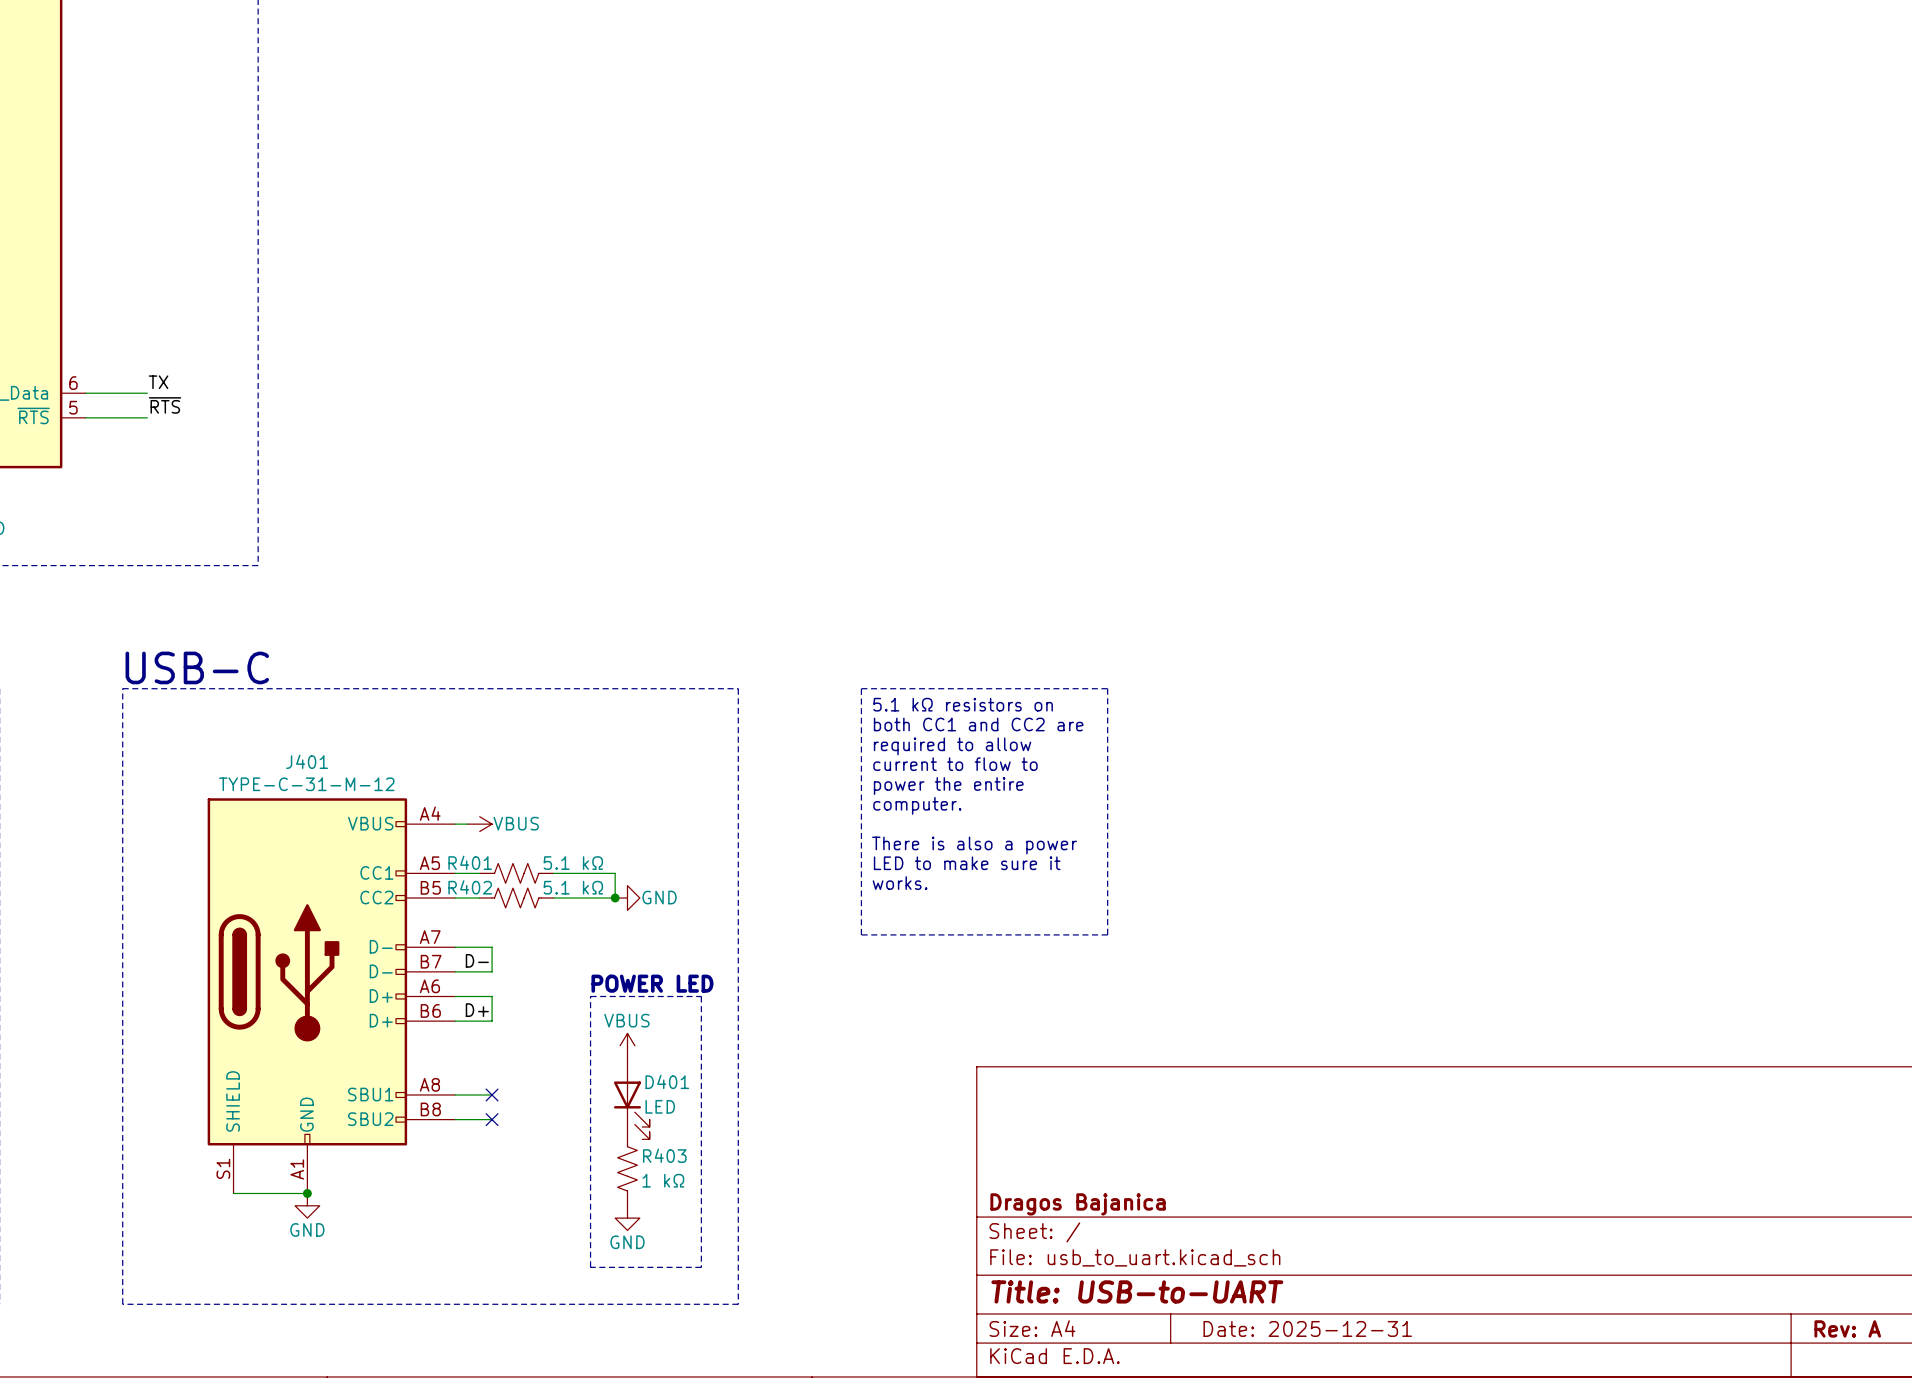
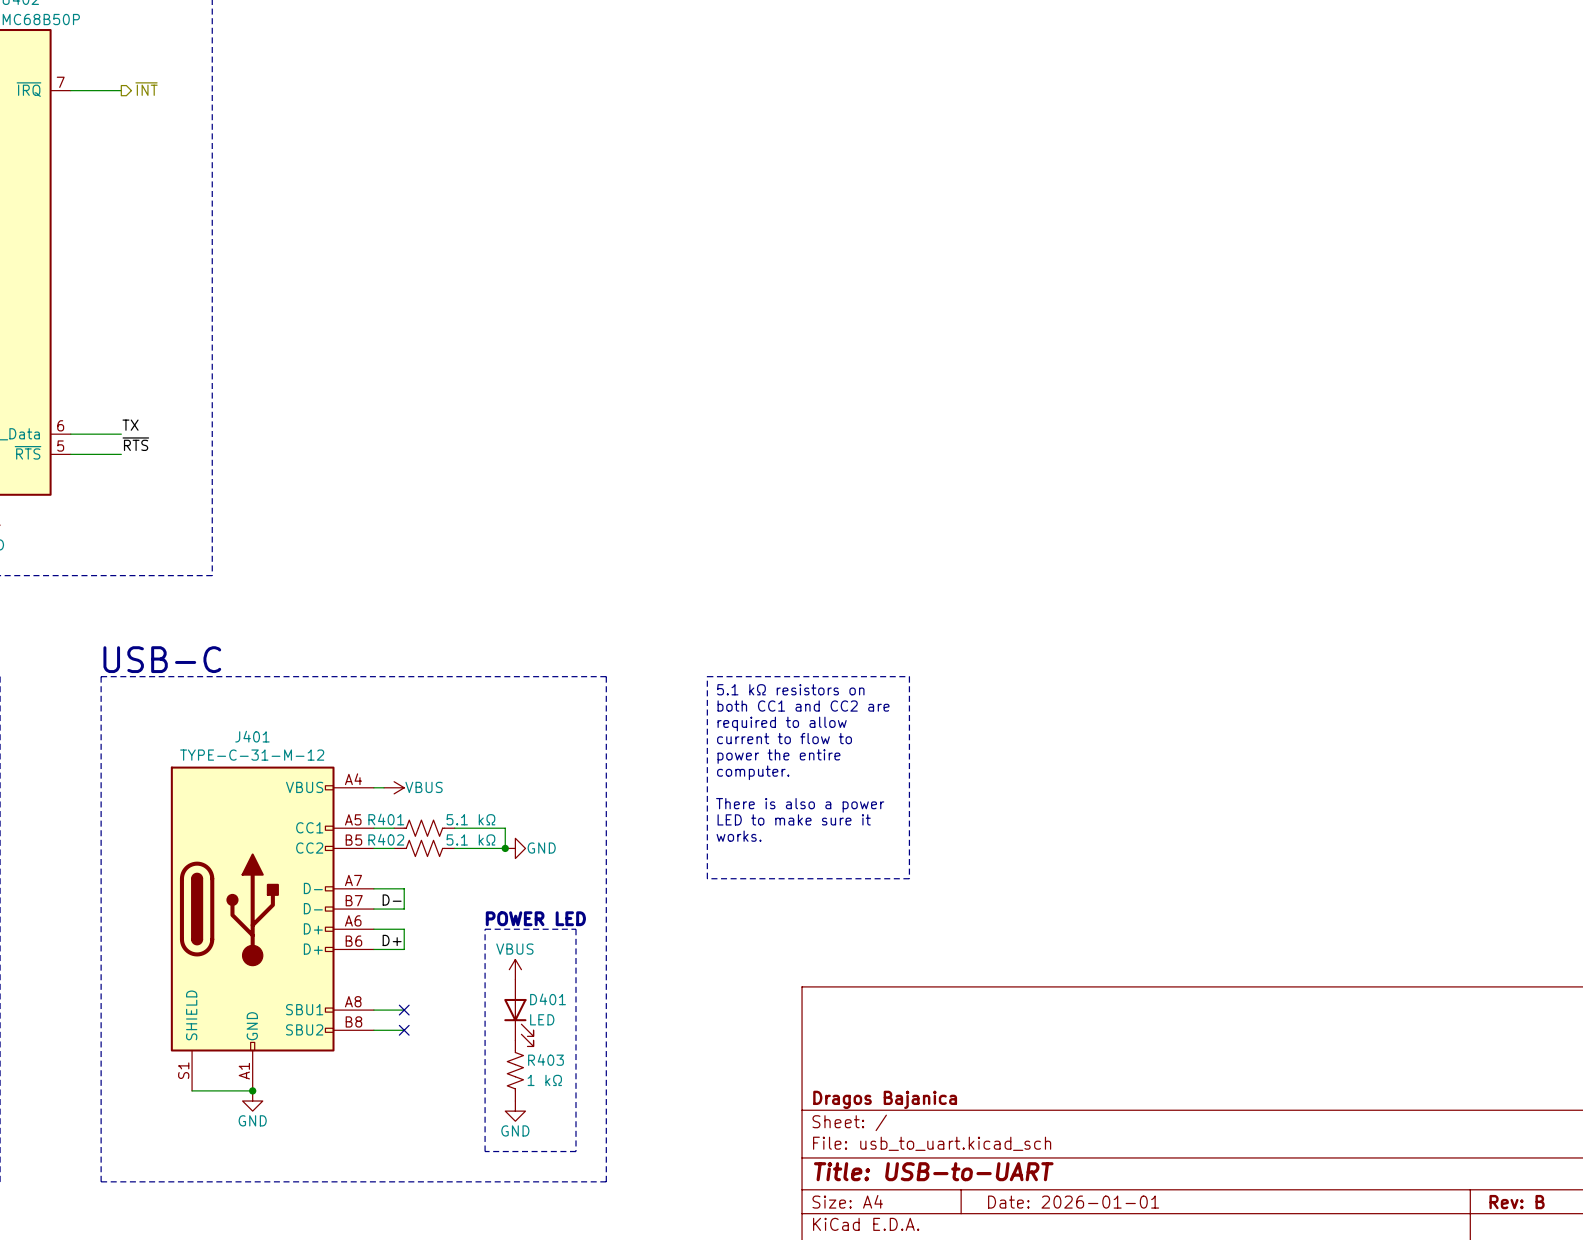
title block: Date: 2025-12-31 (1307, 1328) -> Date: 2026-01-01 (1073, 1202)
title block: Rev: A (1847, 1328) -> Rev: B (1517, 1202)

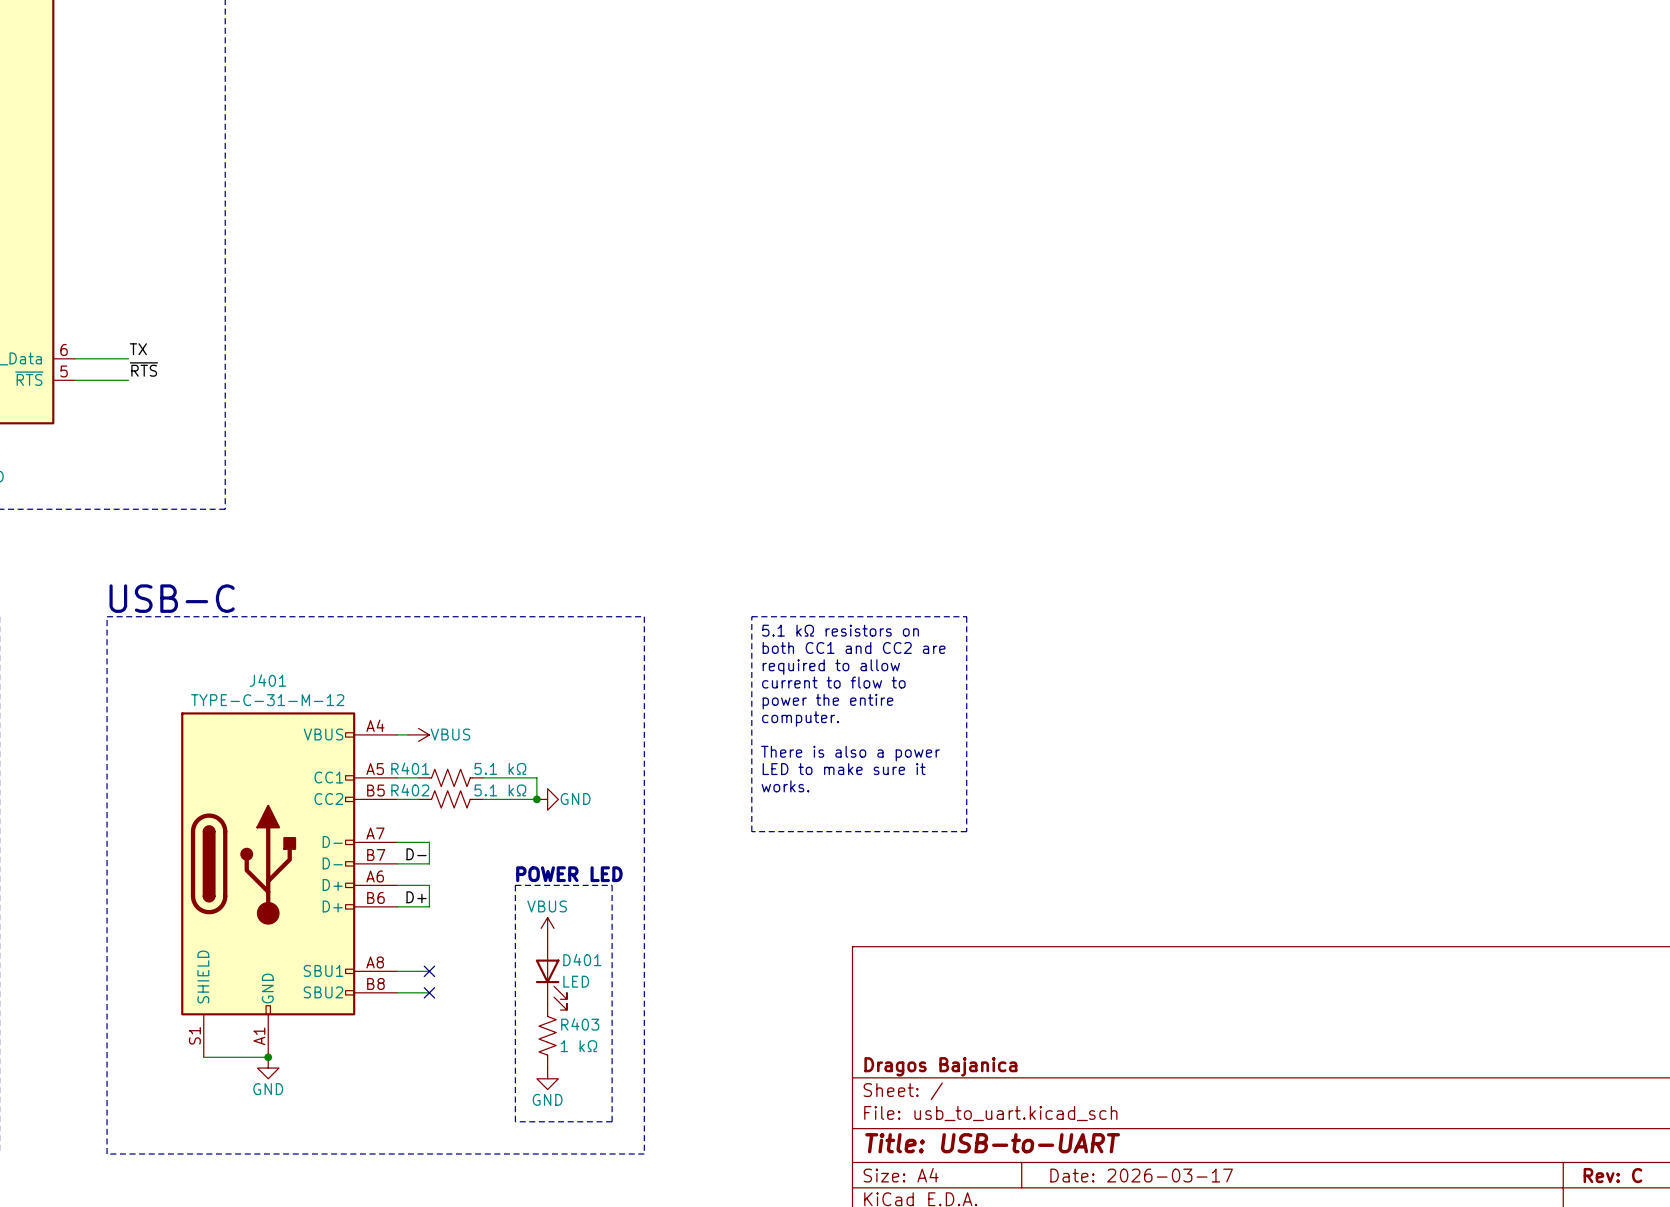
title block: Date: 2026-01-01 (1073, 1202) -> Date: 2026-03-17 (1141, 1175)
title block: Rev: B (1517, 1202) -> Rev: C (1612, 1175)

